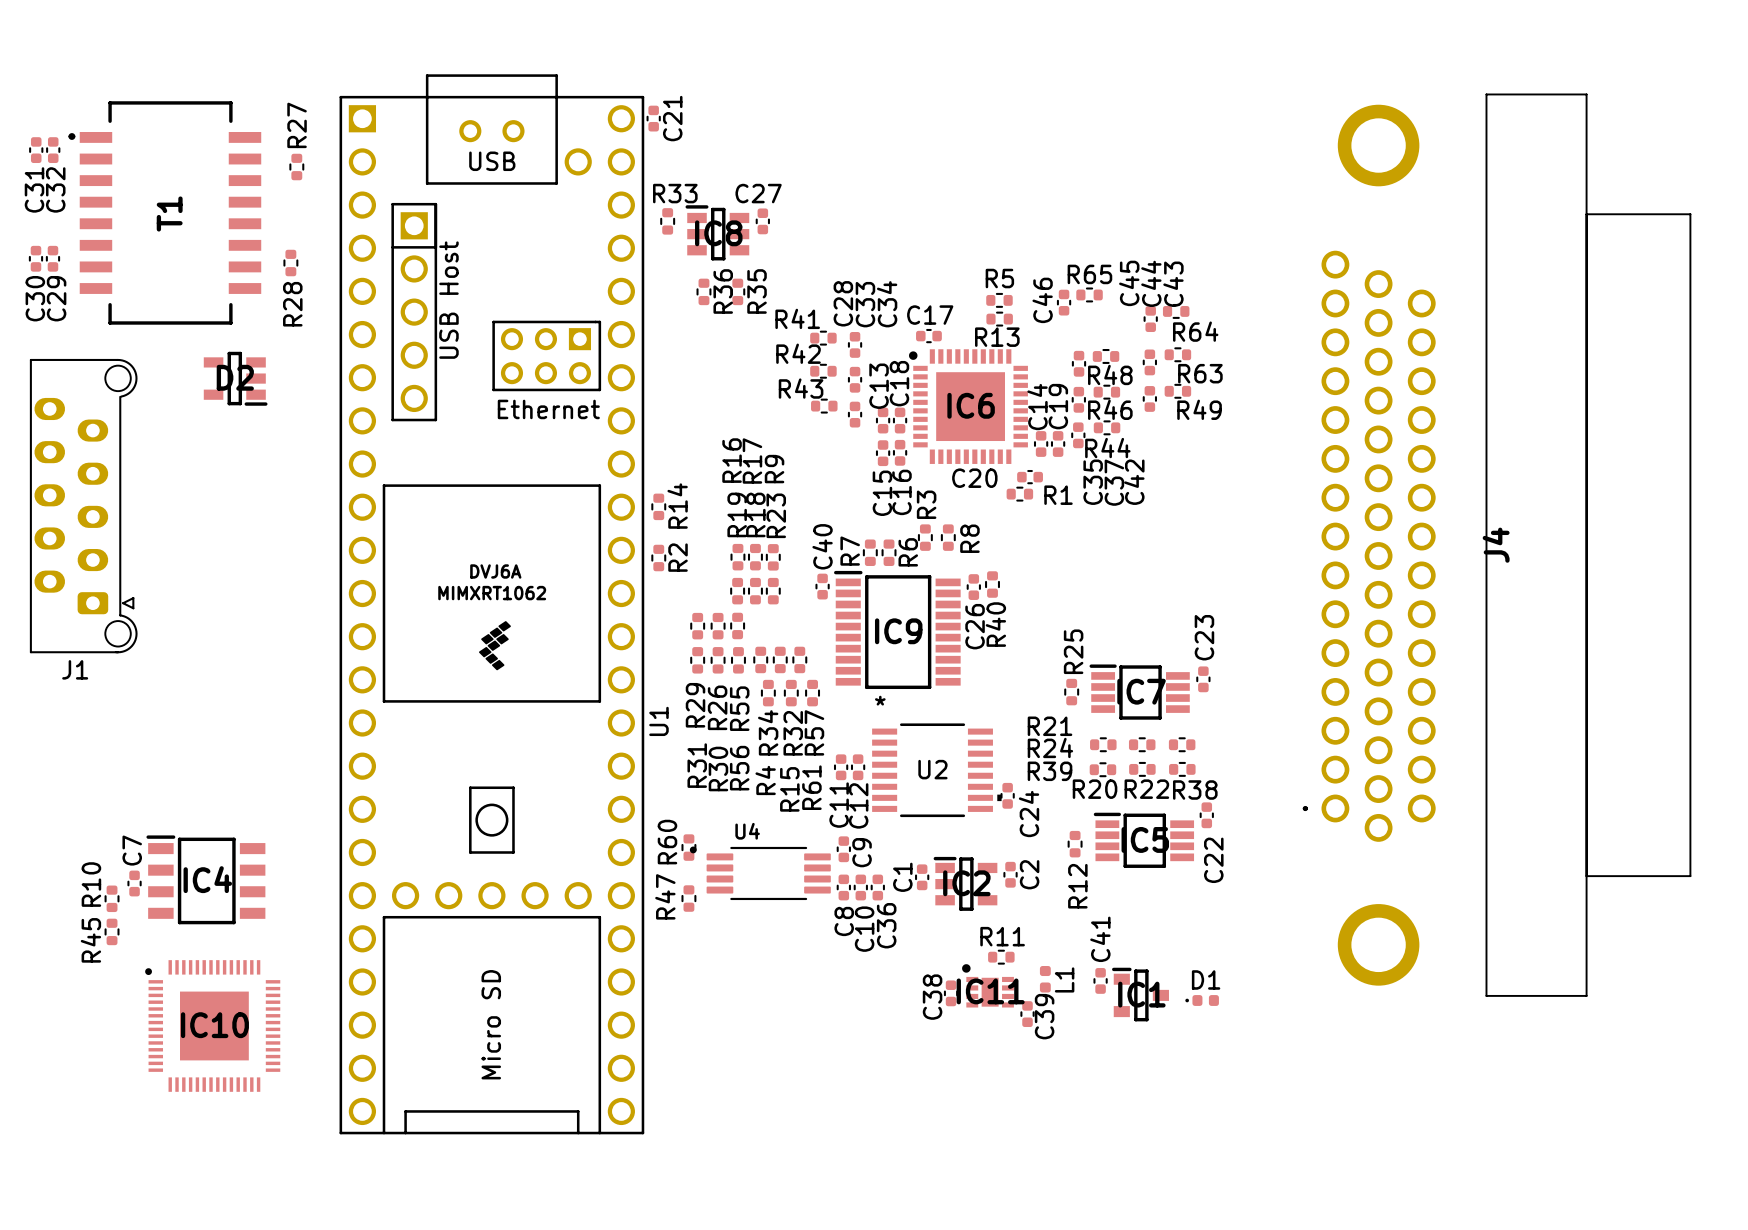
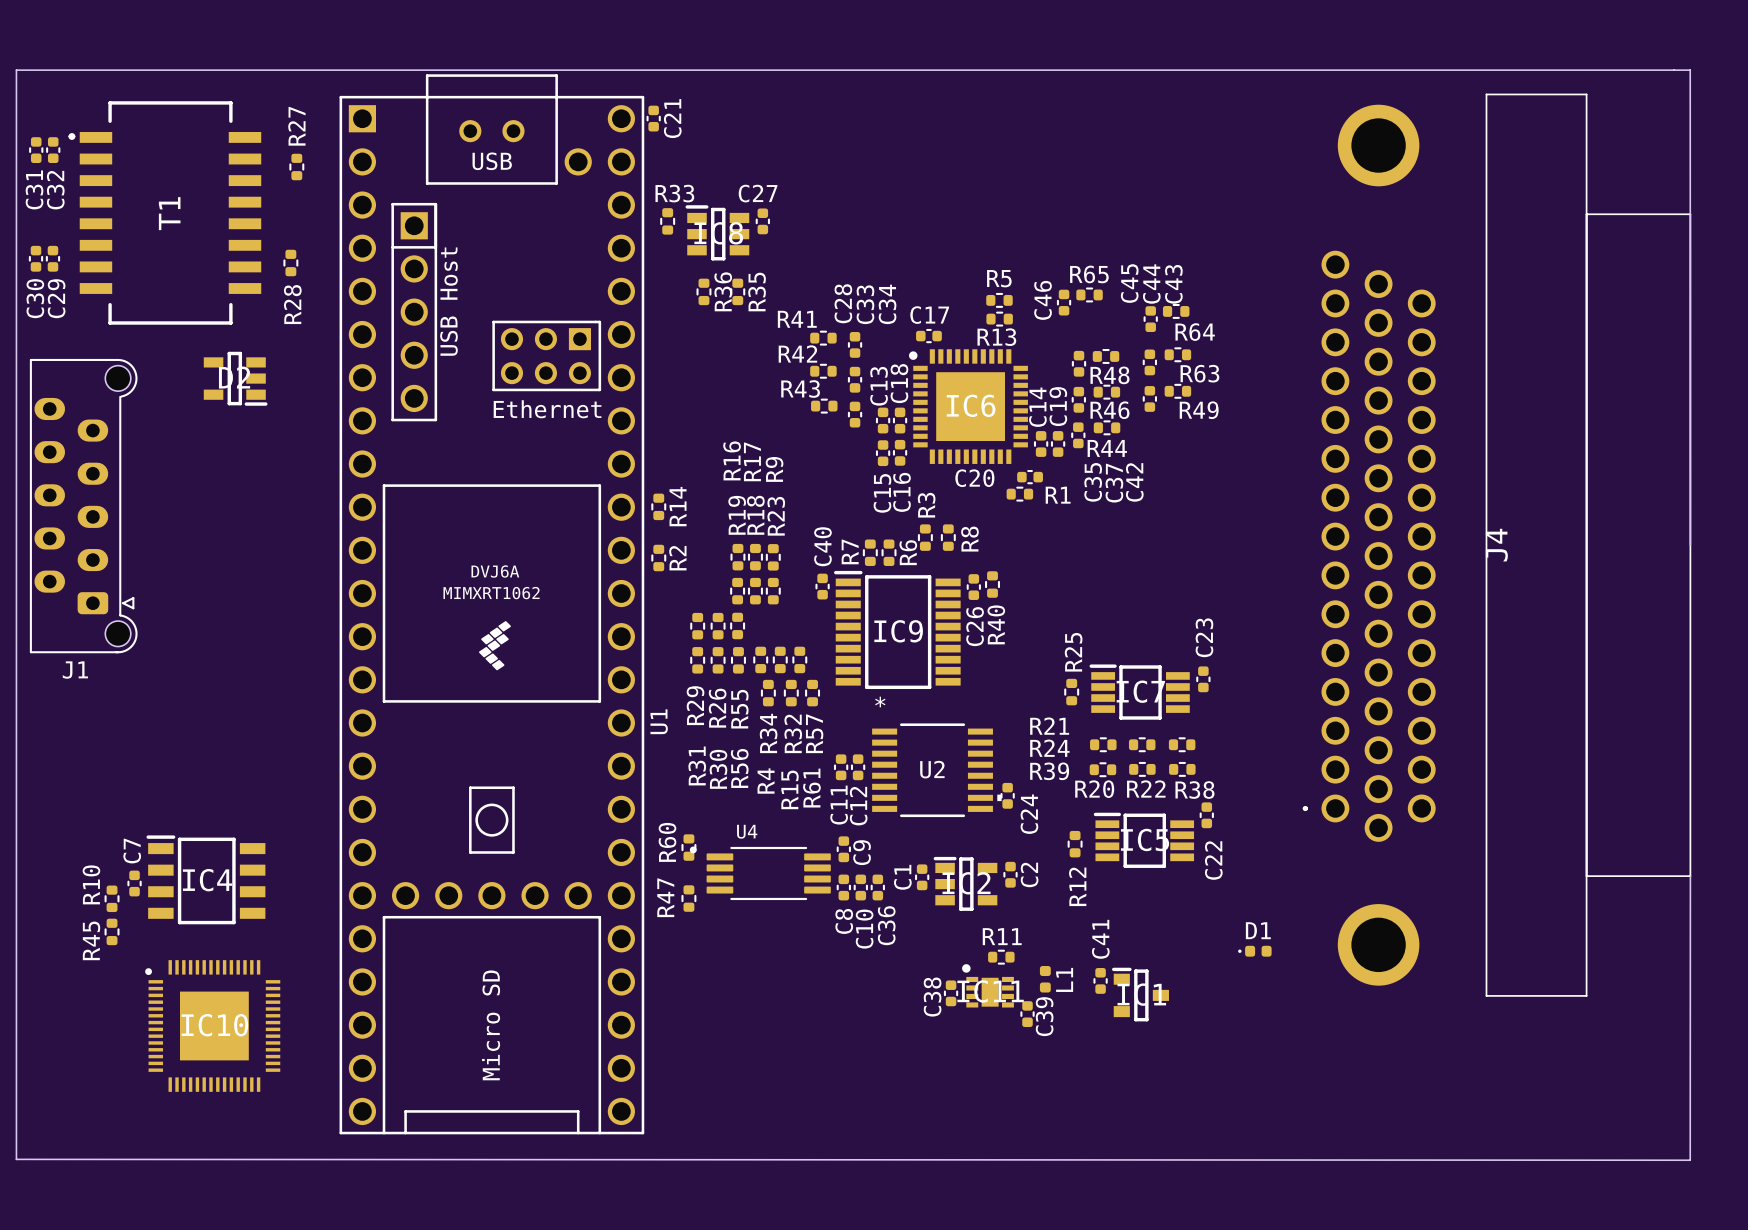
board edge: none -> (1690, 545) (1690, 70) (16, 70) (16, 1159) (1690, 1160) (1690, 876)
D1 position: (1202, 1000) -> (1254, 951)

